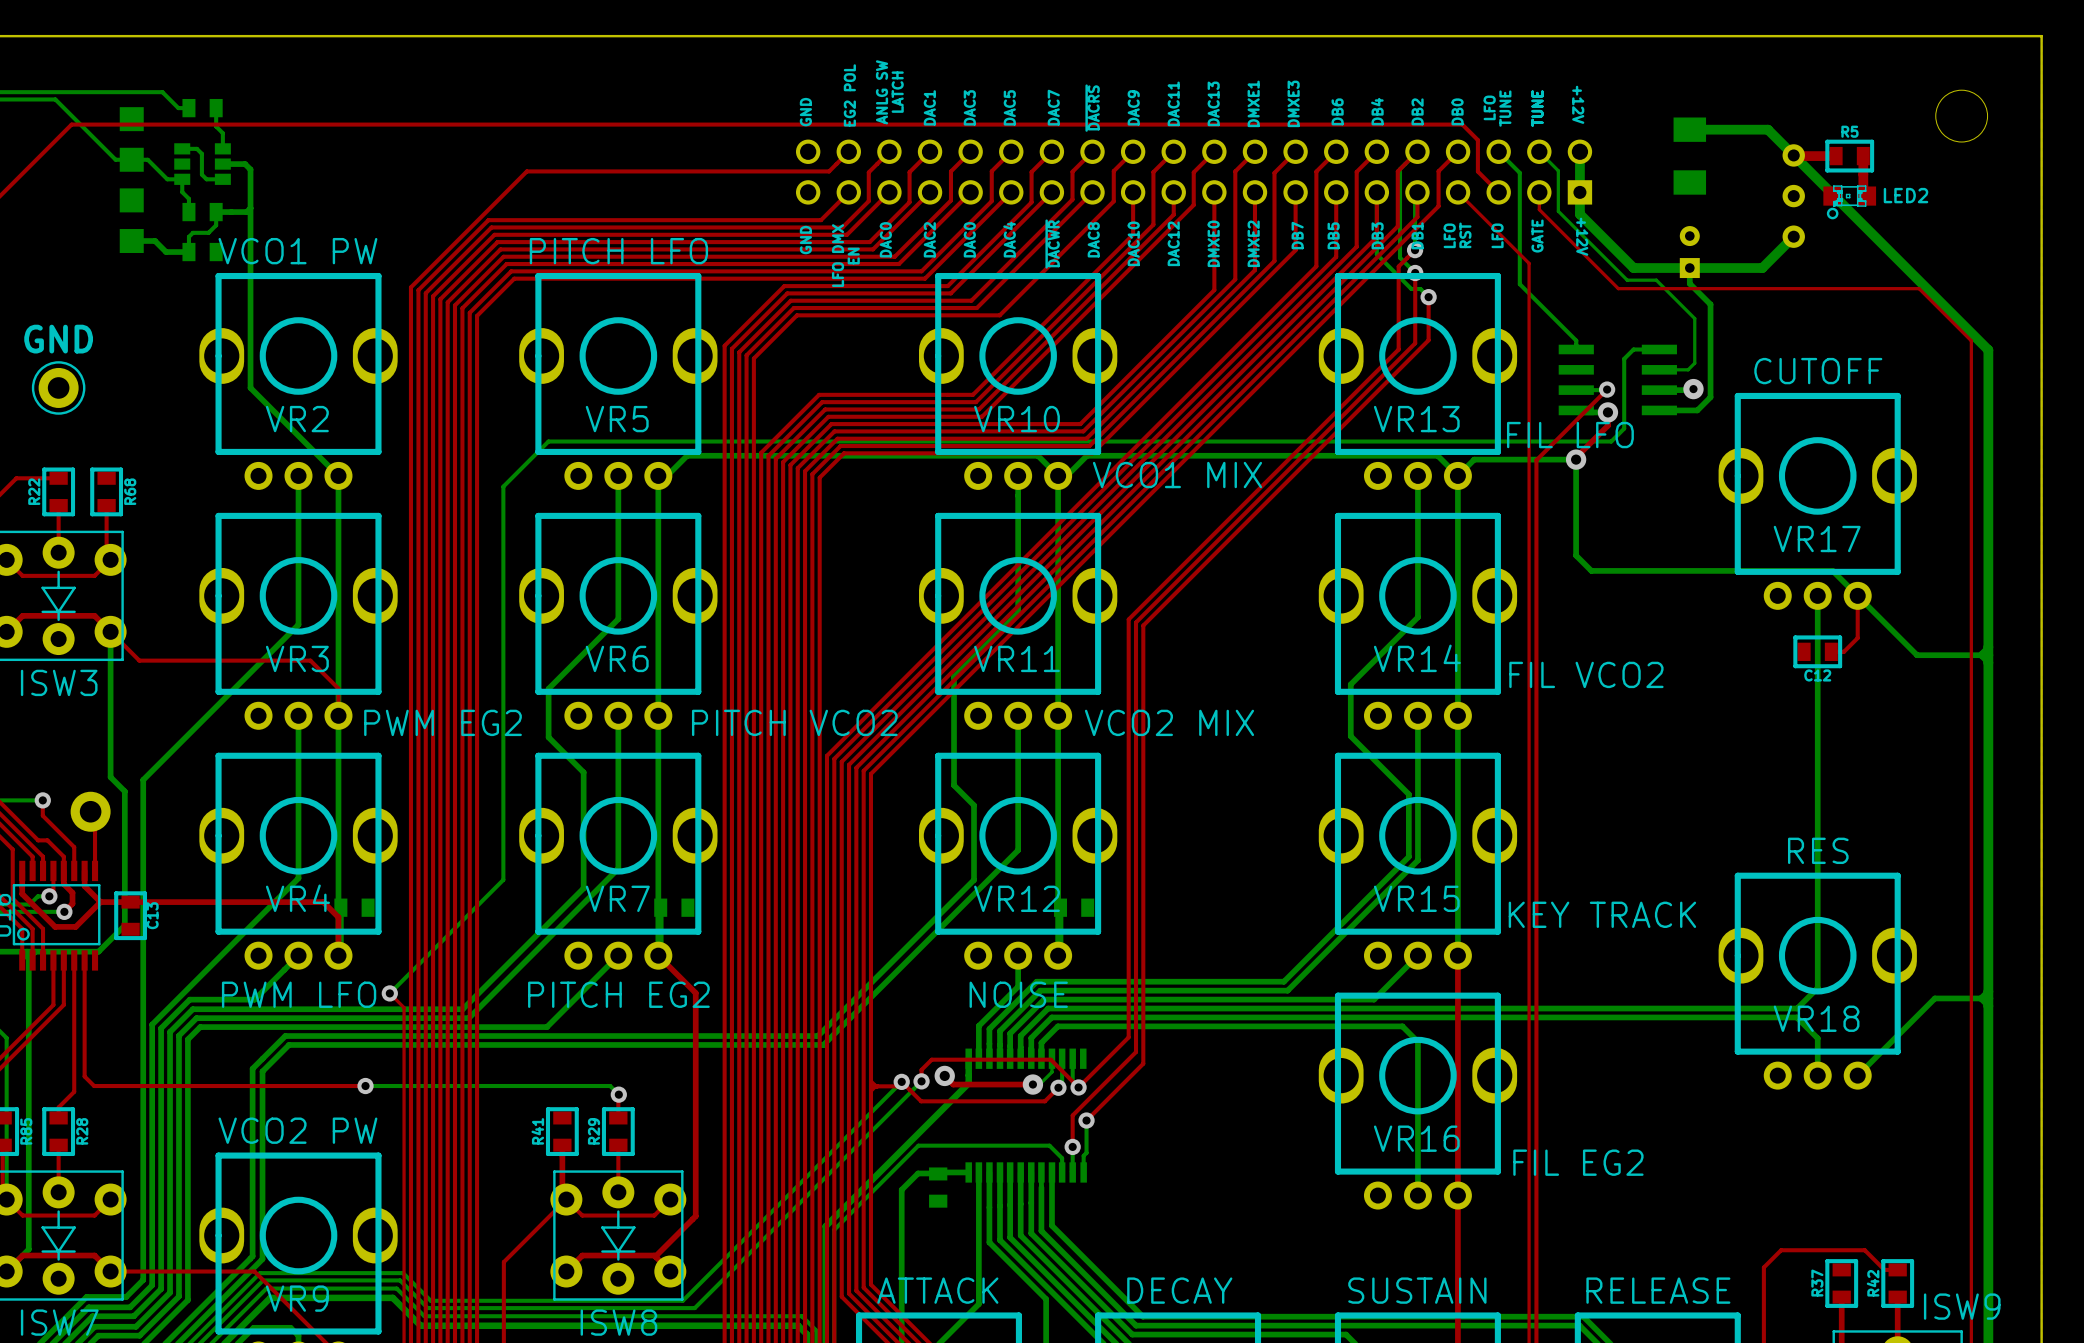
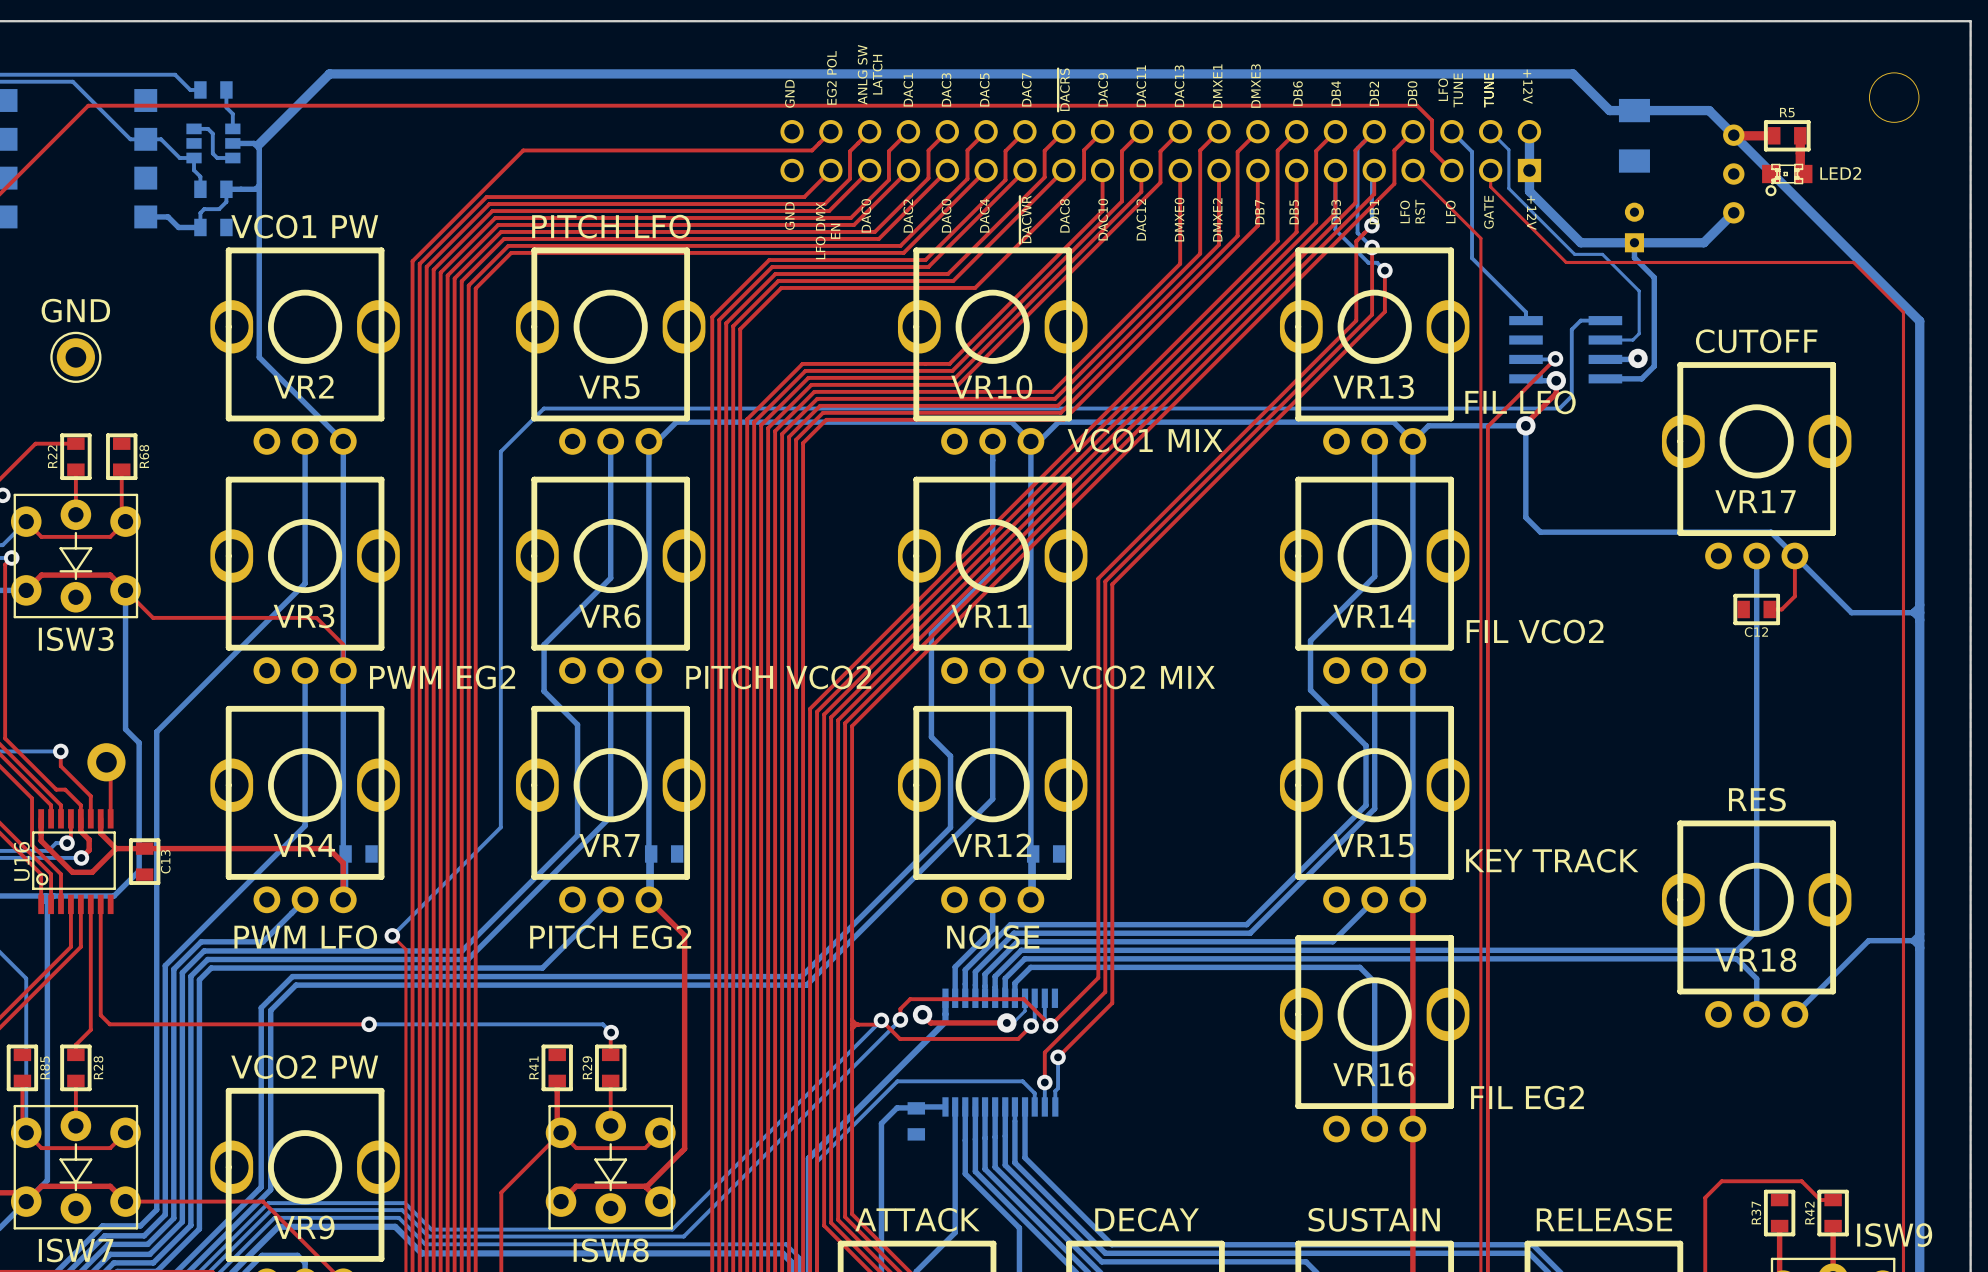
bottom track: none -> (1634, 110) (1609, 110) (1572, 73) (329, 73) (259, 144)

